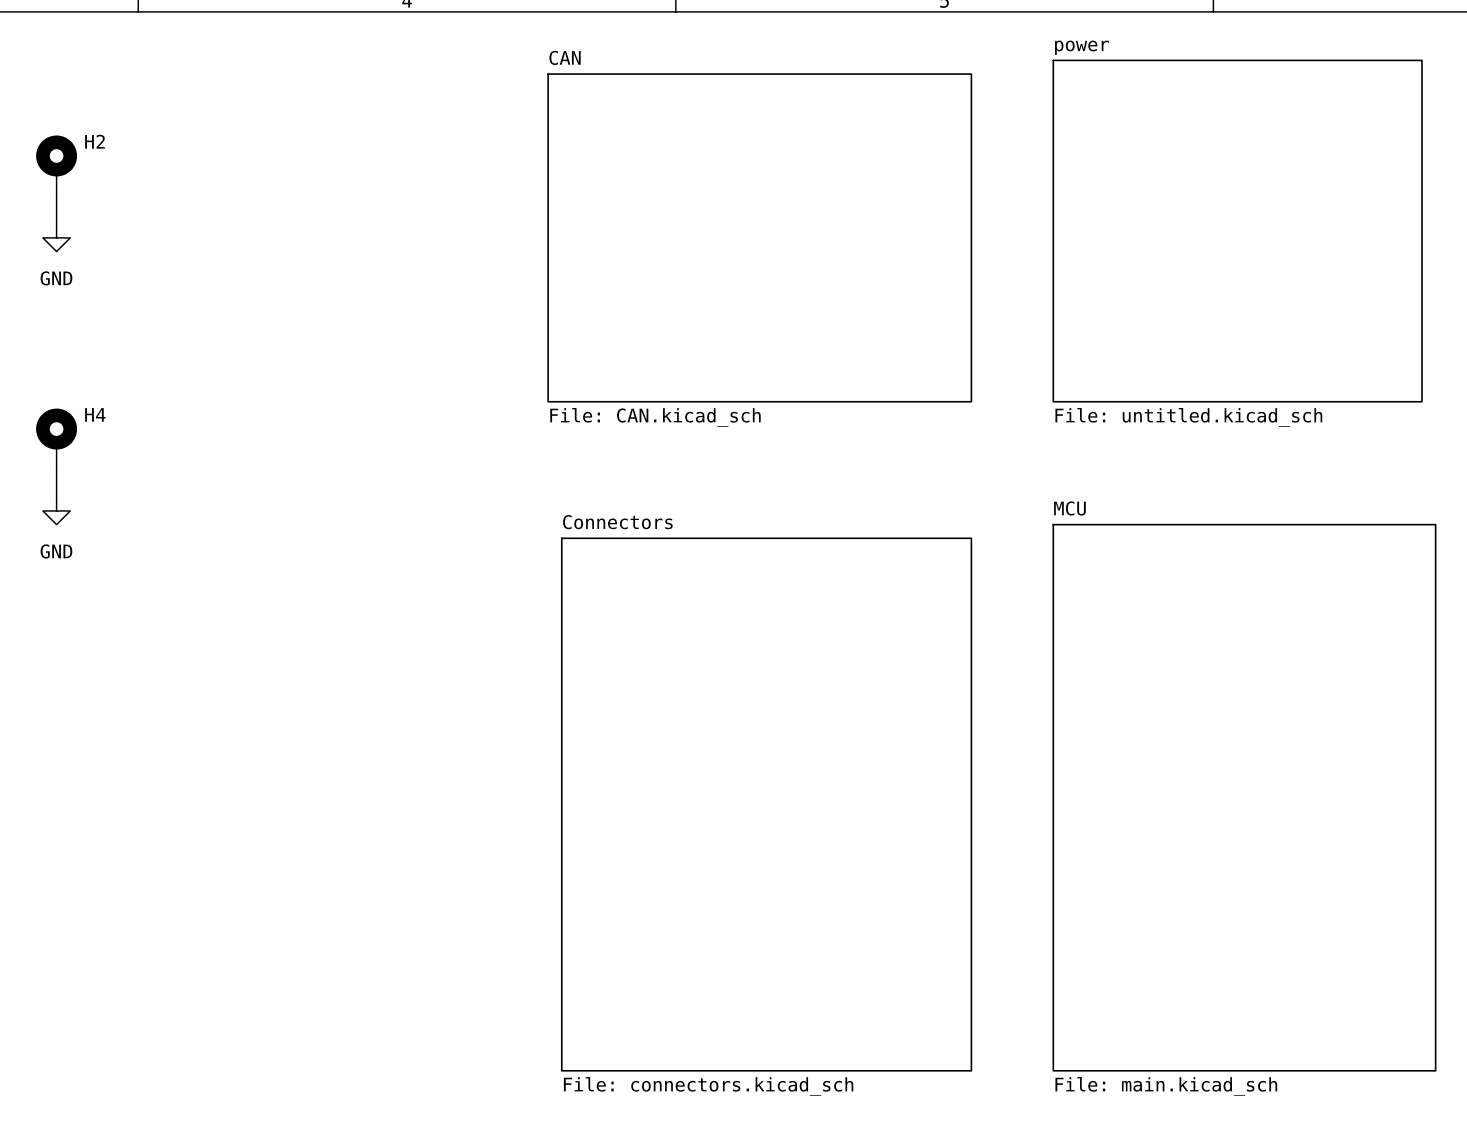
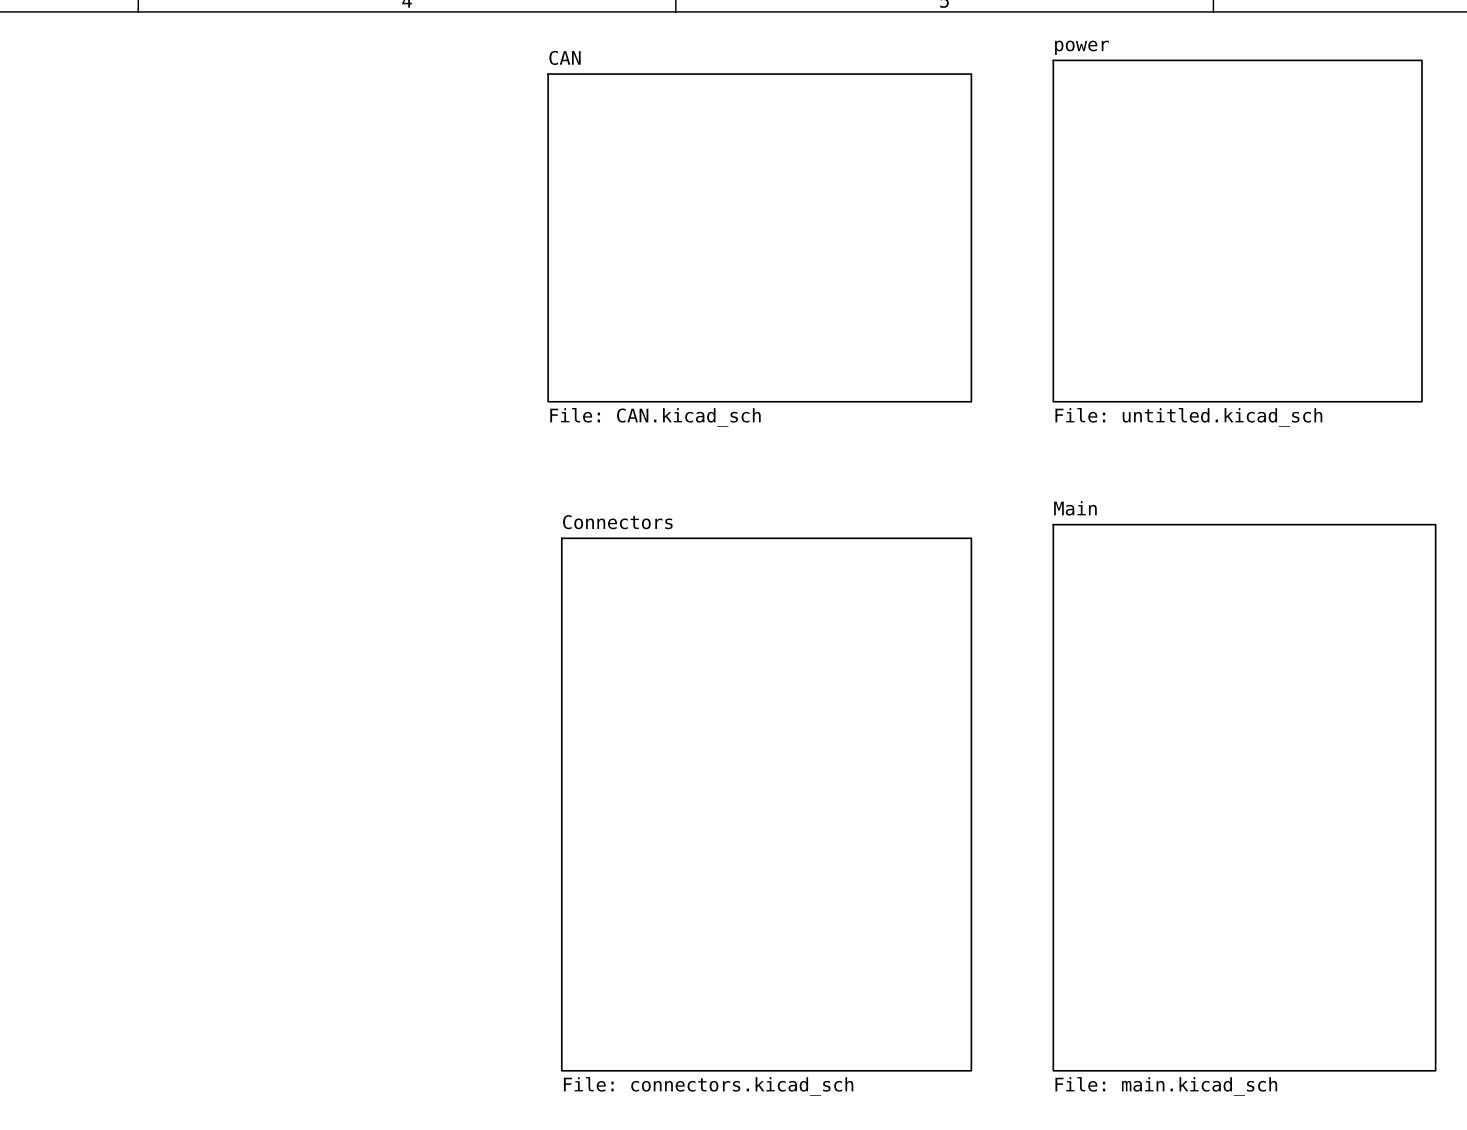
H2: (56, 166) -> none
wire: (56, 196) (56, 224) -> none
power symbol: GND (56, 237) -> none
H4: (56, 439) -> none
wire: (56, 470) (56, 497) -> none
sheet MCU name: MCU (1069, 508) -> Main (1075, 508)
power symbol: GND (56, 510) -> none

